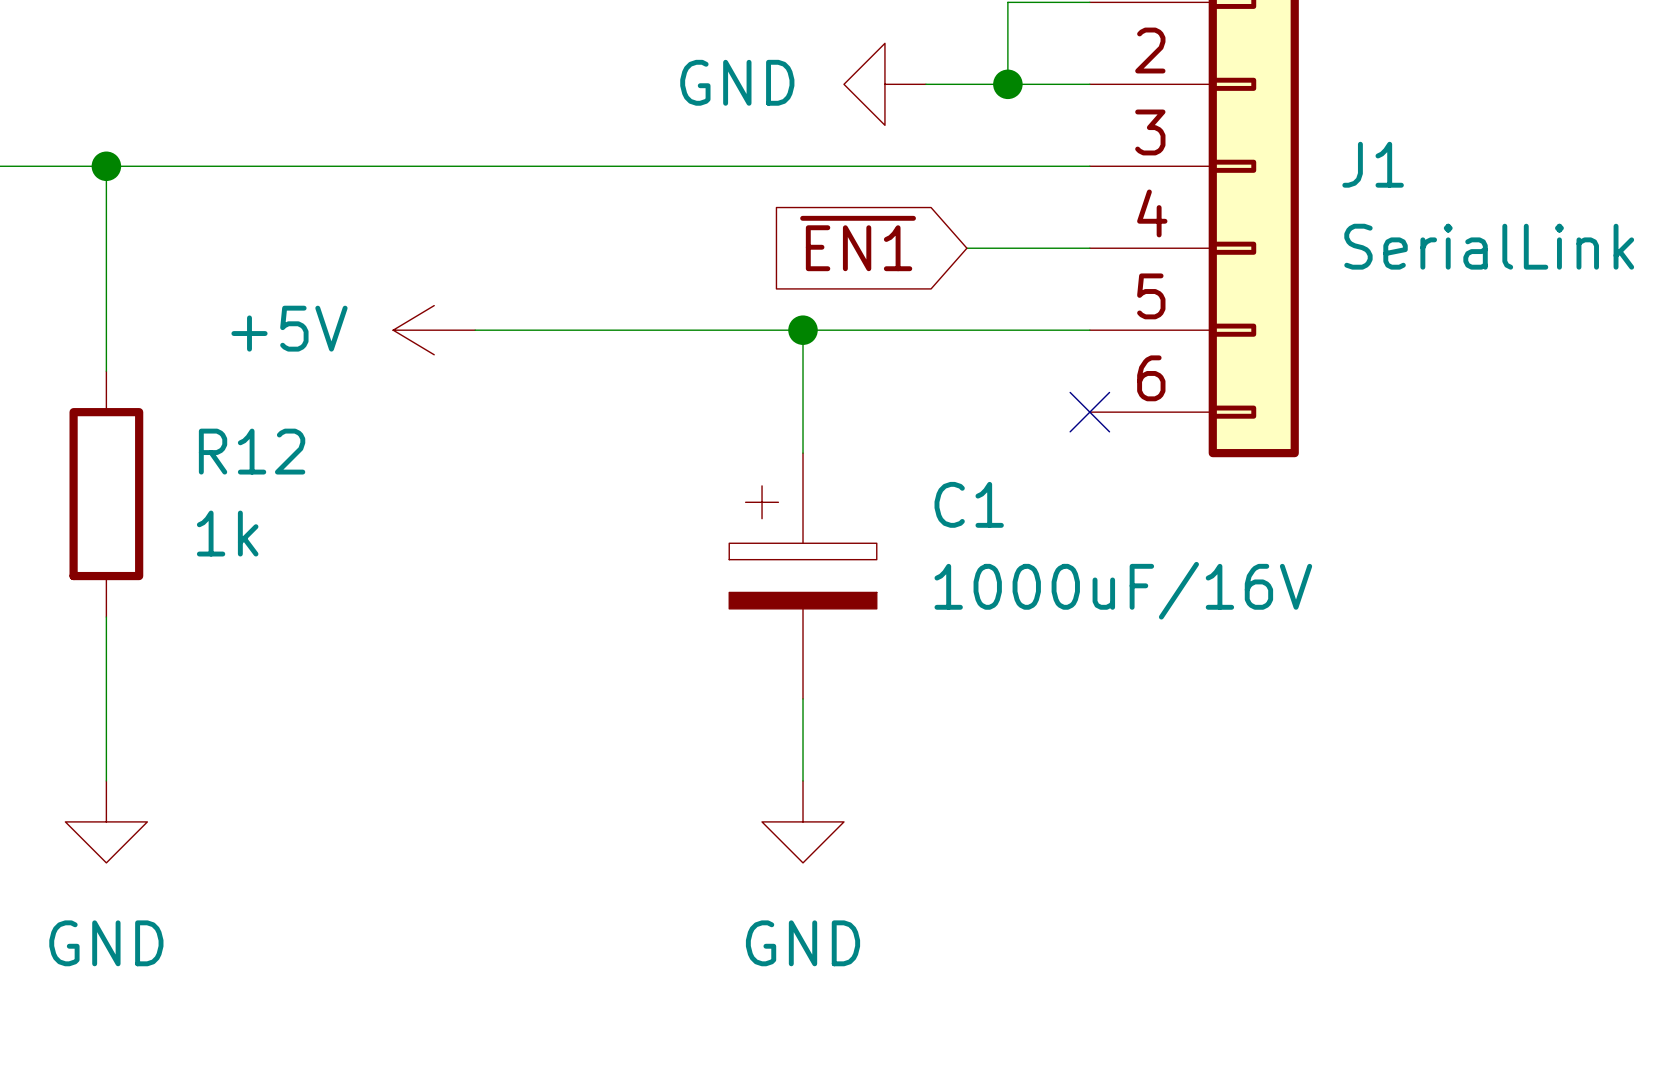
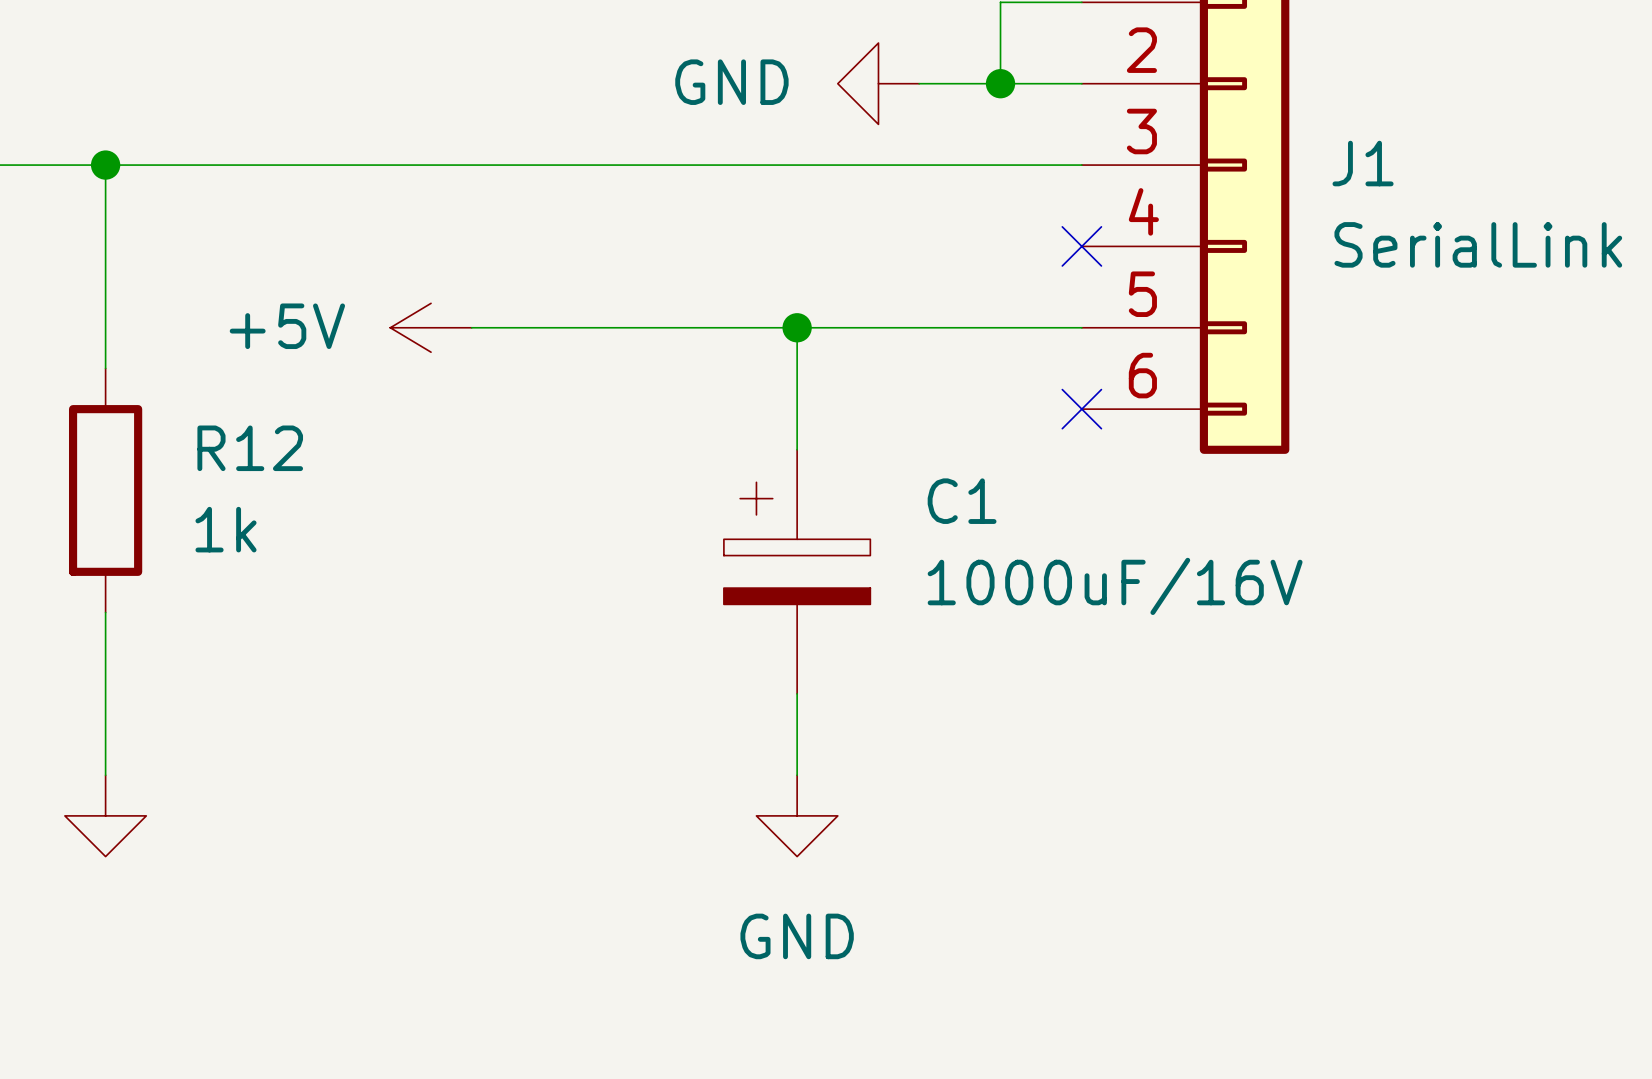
global label: ~{EN1} (858, 243) -> none
wire: (966, 248) (1089, 248) -> none
no-connect mark: none -> (1081, 246)
power symbol text: GND (106, 943) -> none

